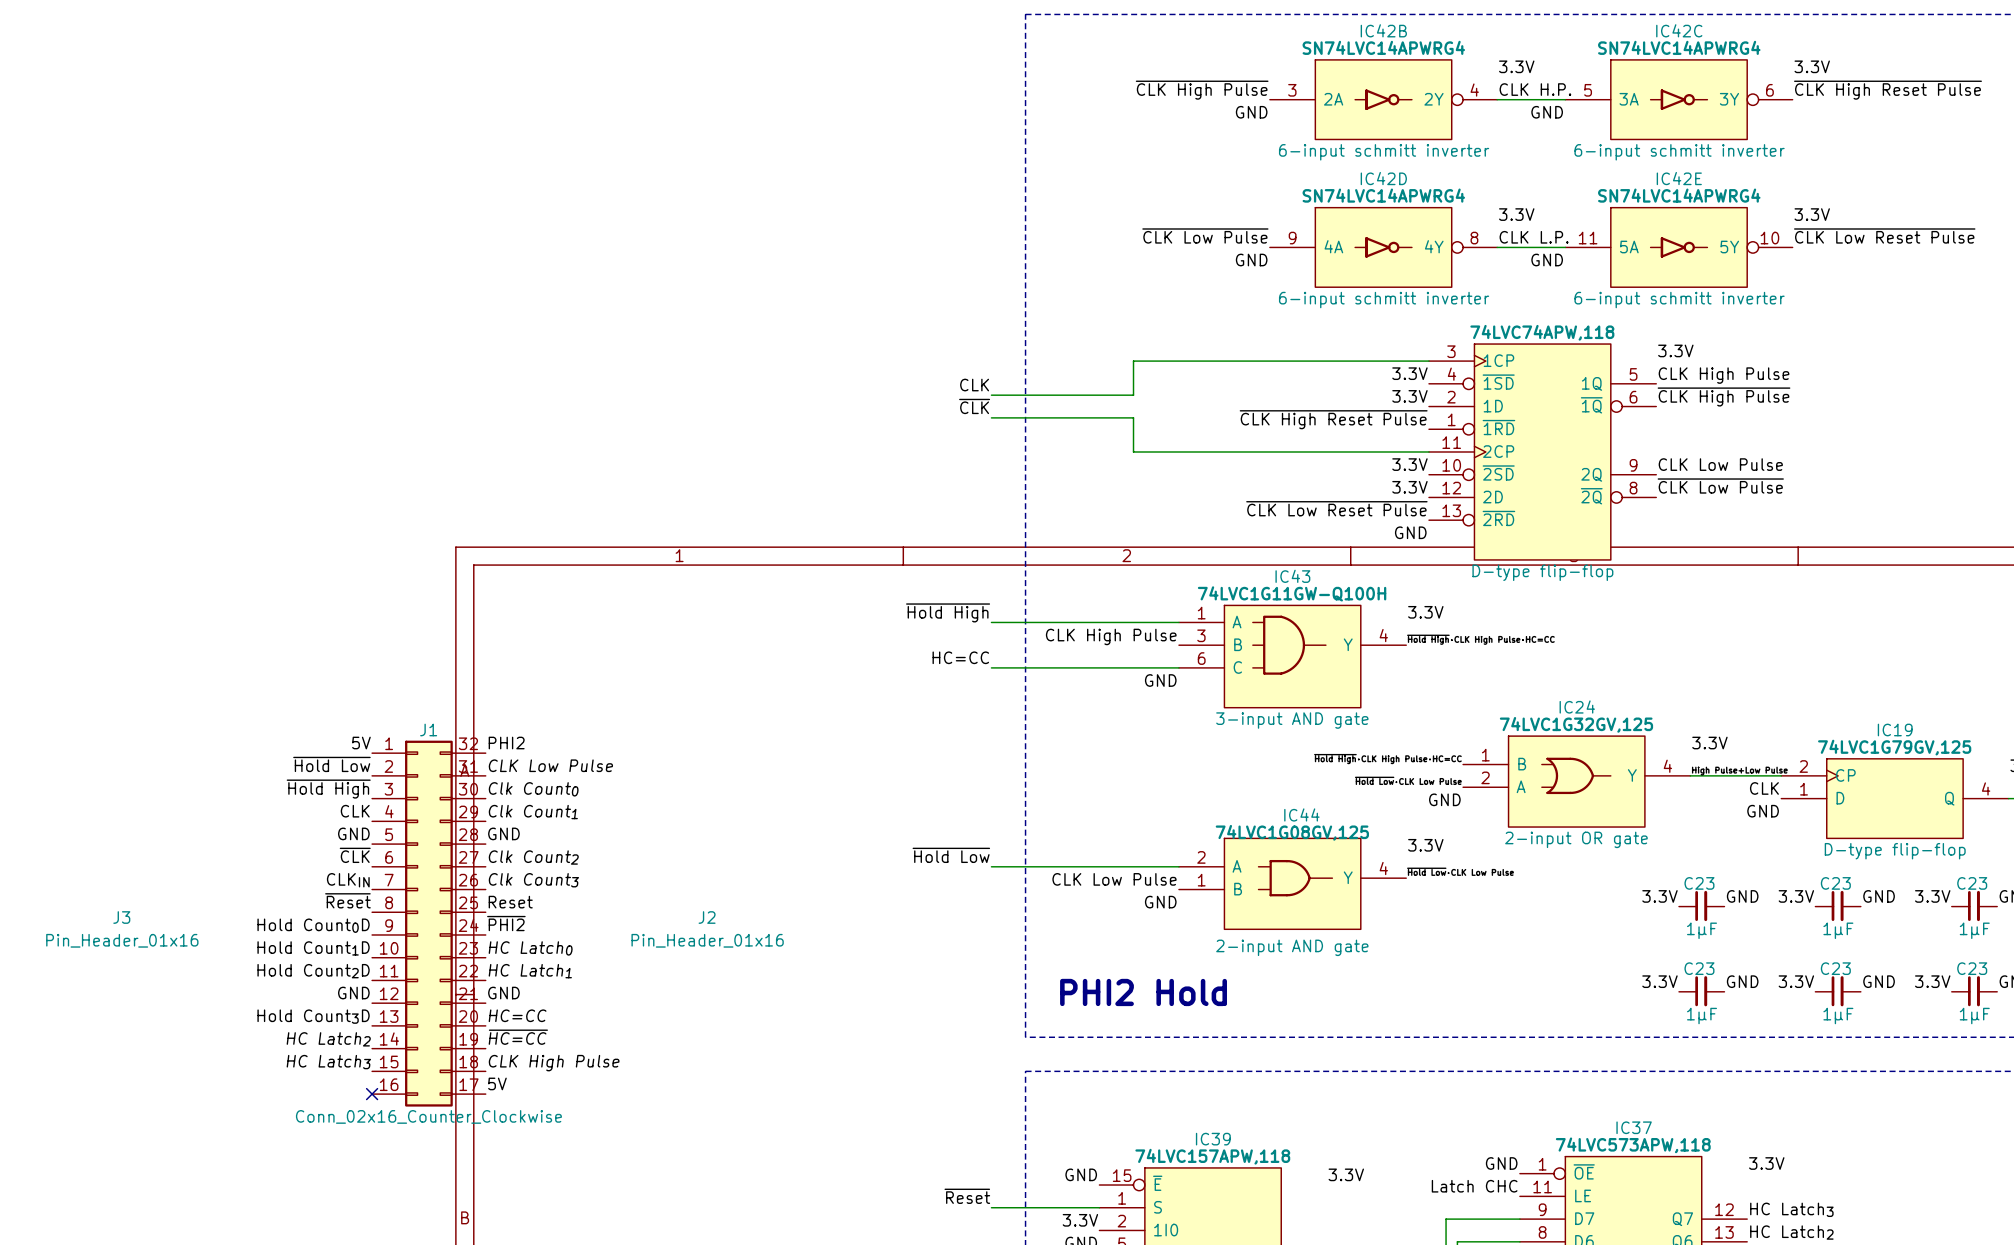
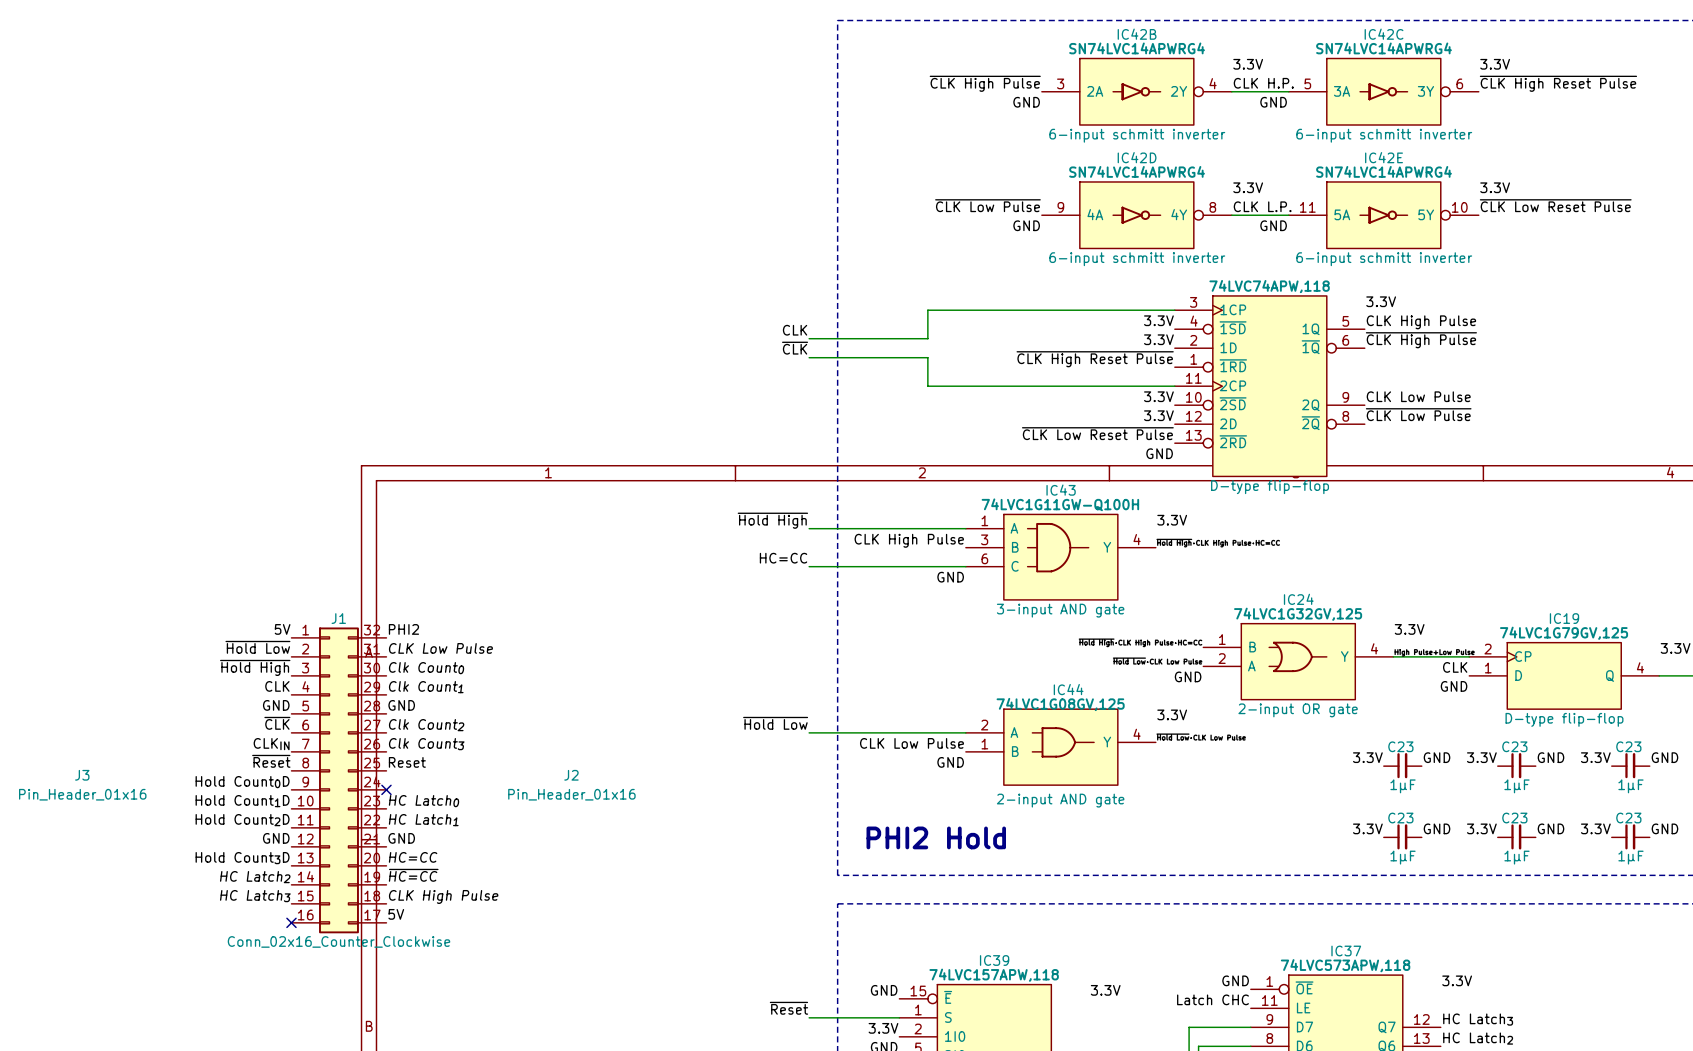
label: ~{PHI2} (506, 923) -> none
no-connect mark: none -> (386, 789)

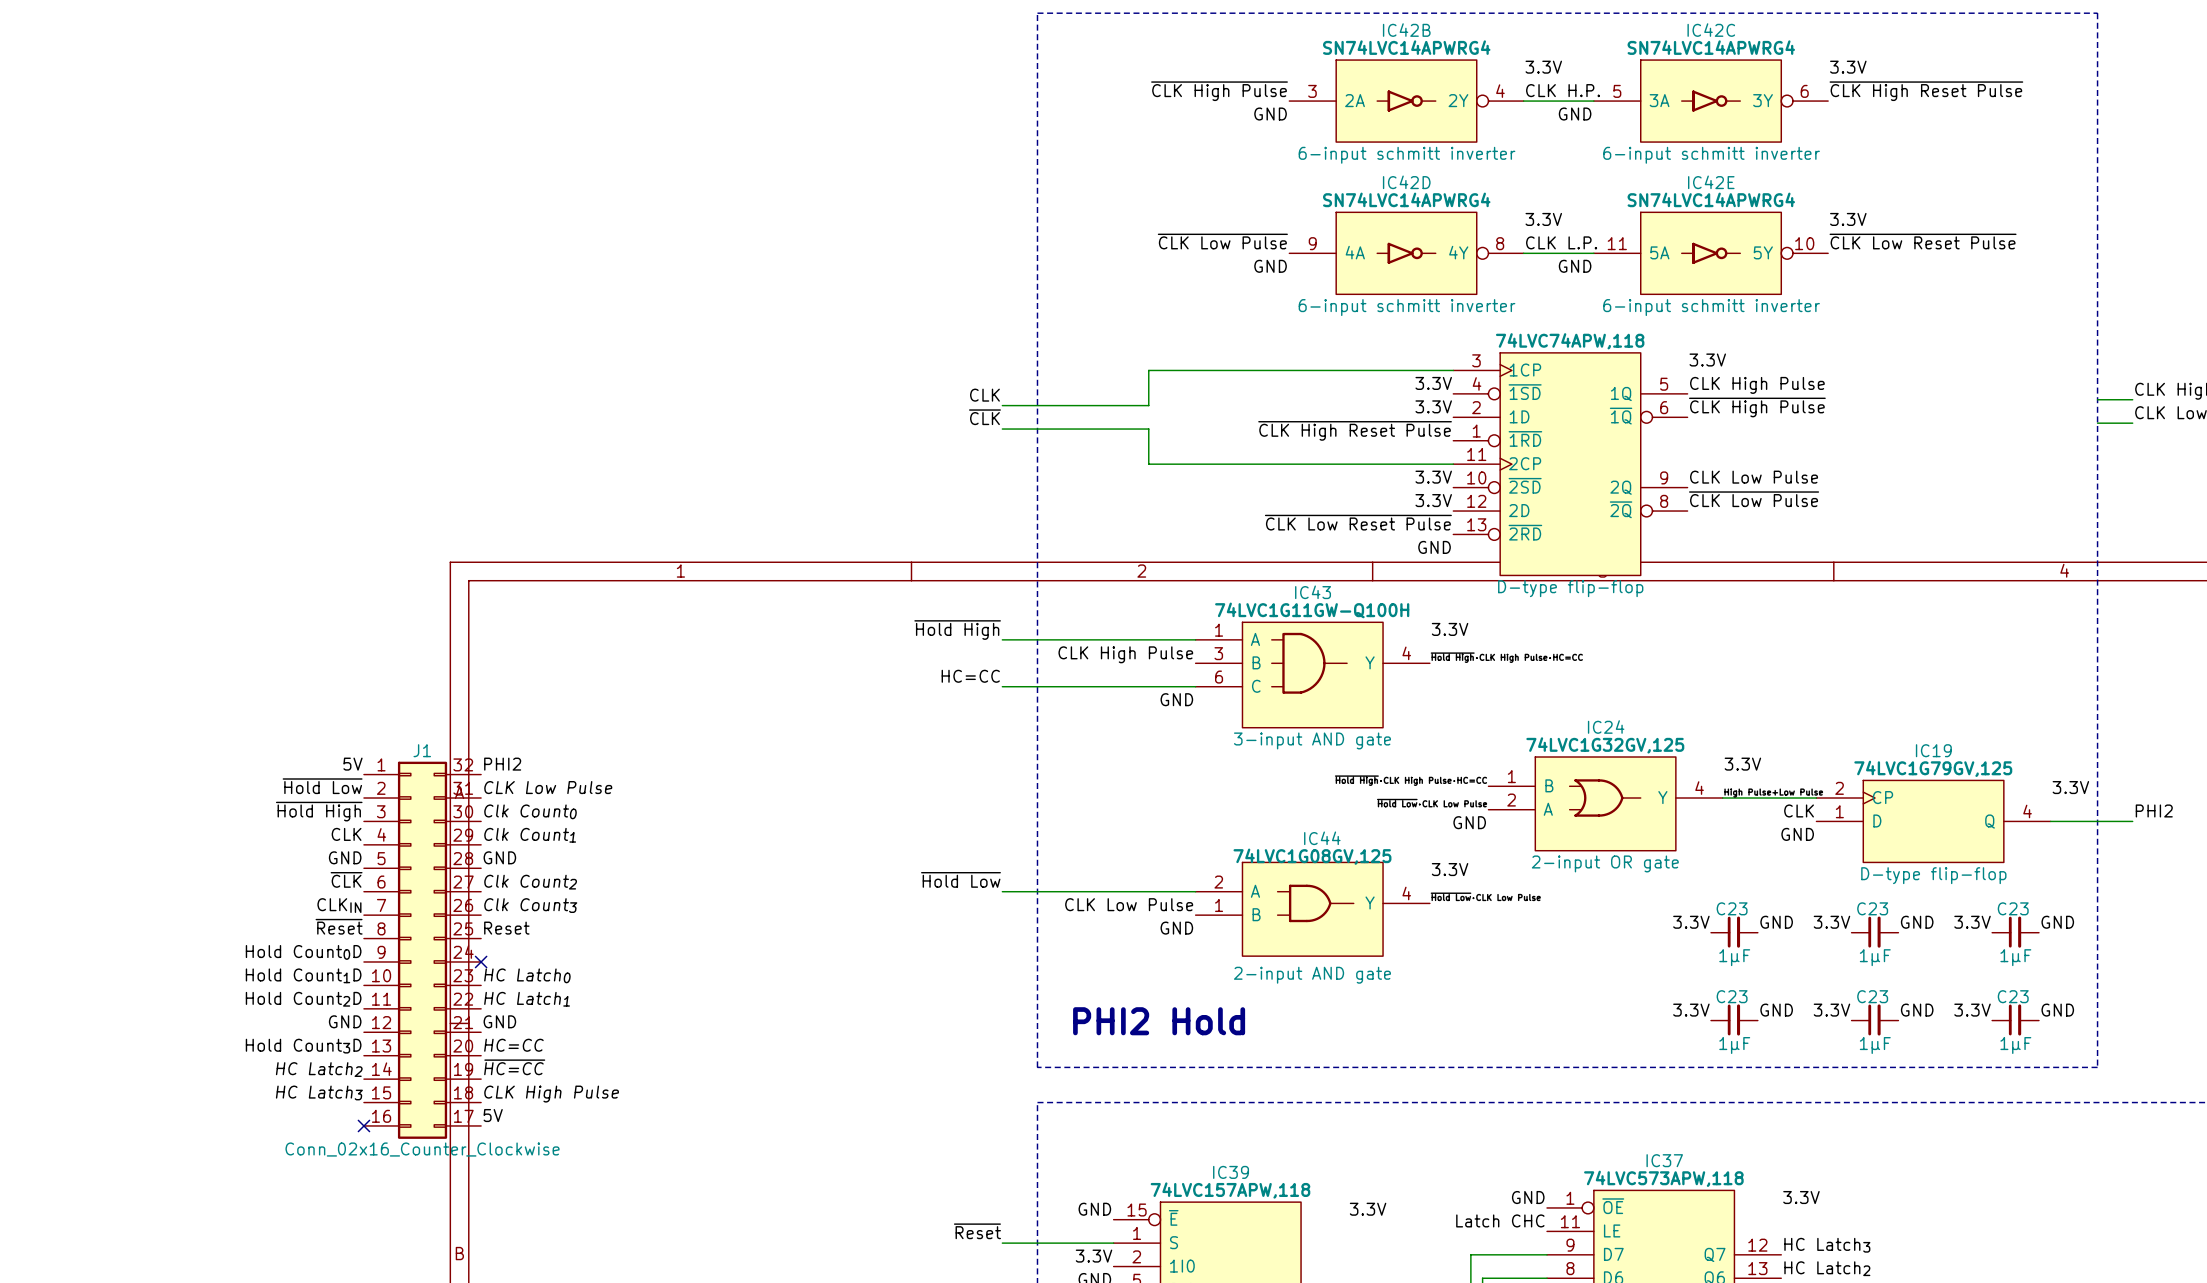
J3: Pin_Header_01x16 (82, 785) -> none
J2: Pin_Header_01x16 (571, 785) -> none

